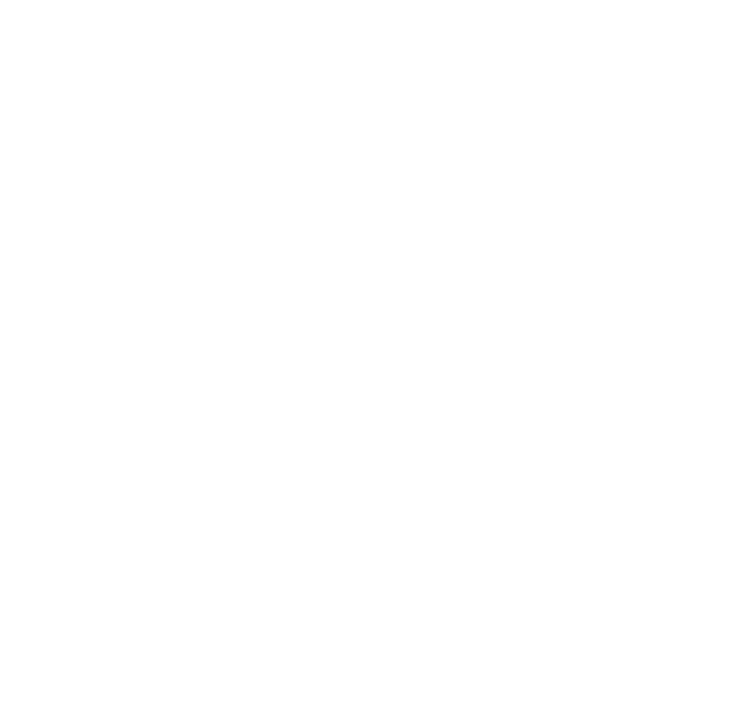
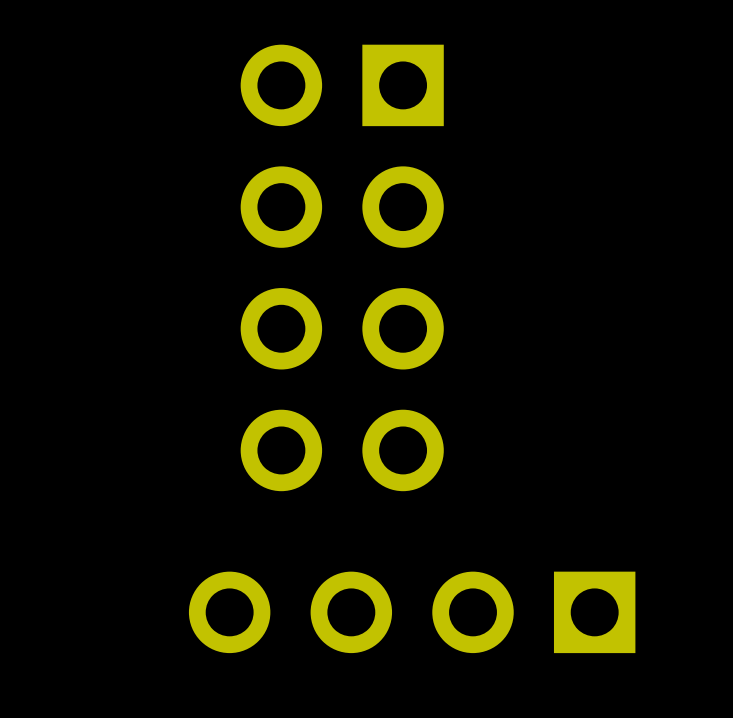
part: none -> (342, 267)
part: none -> (412, 612)

